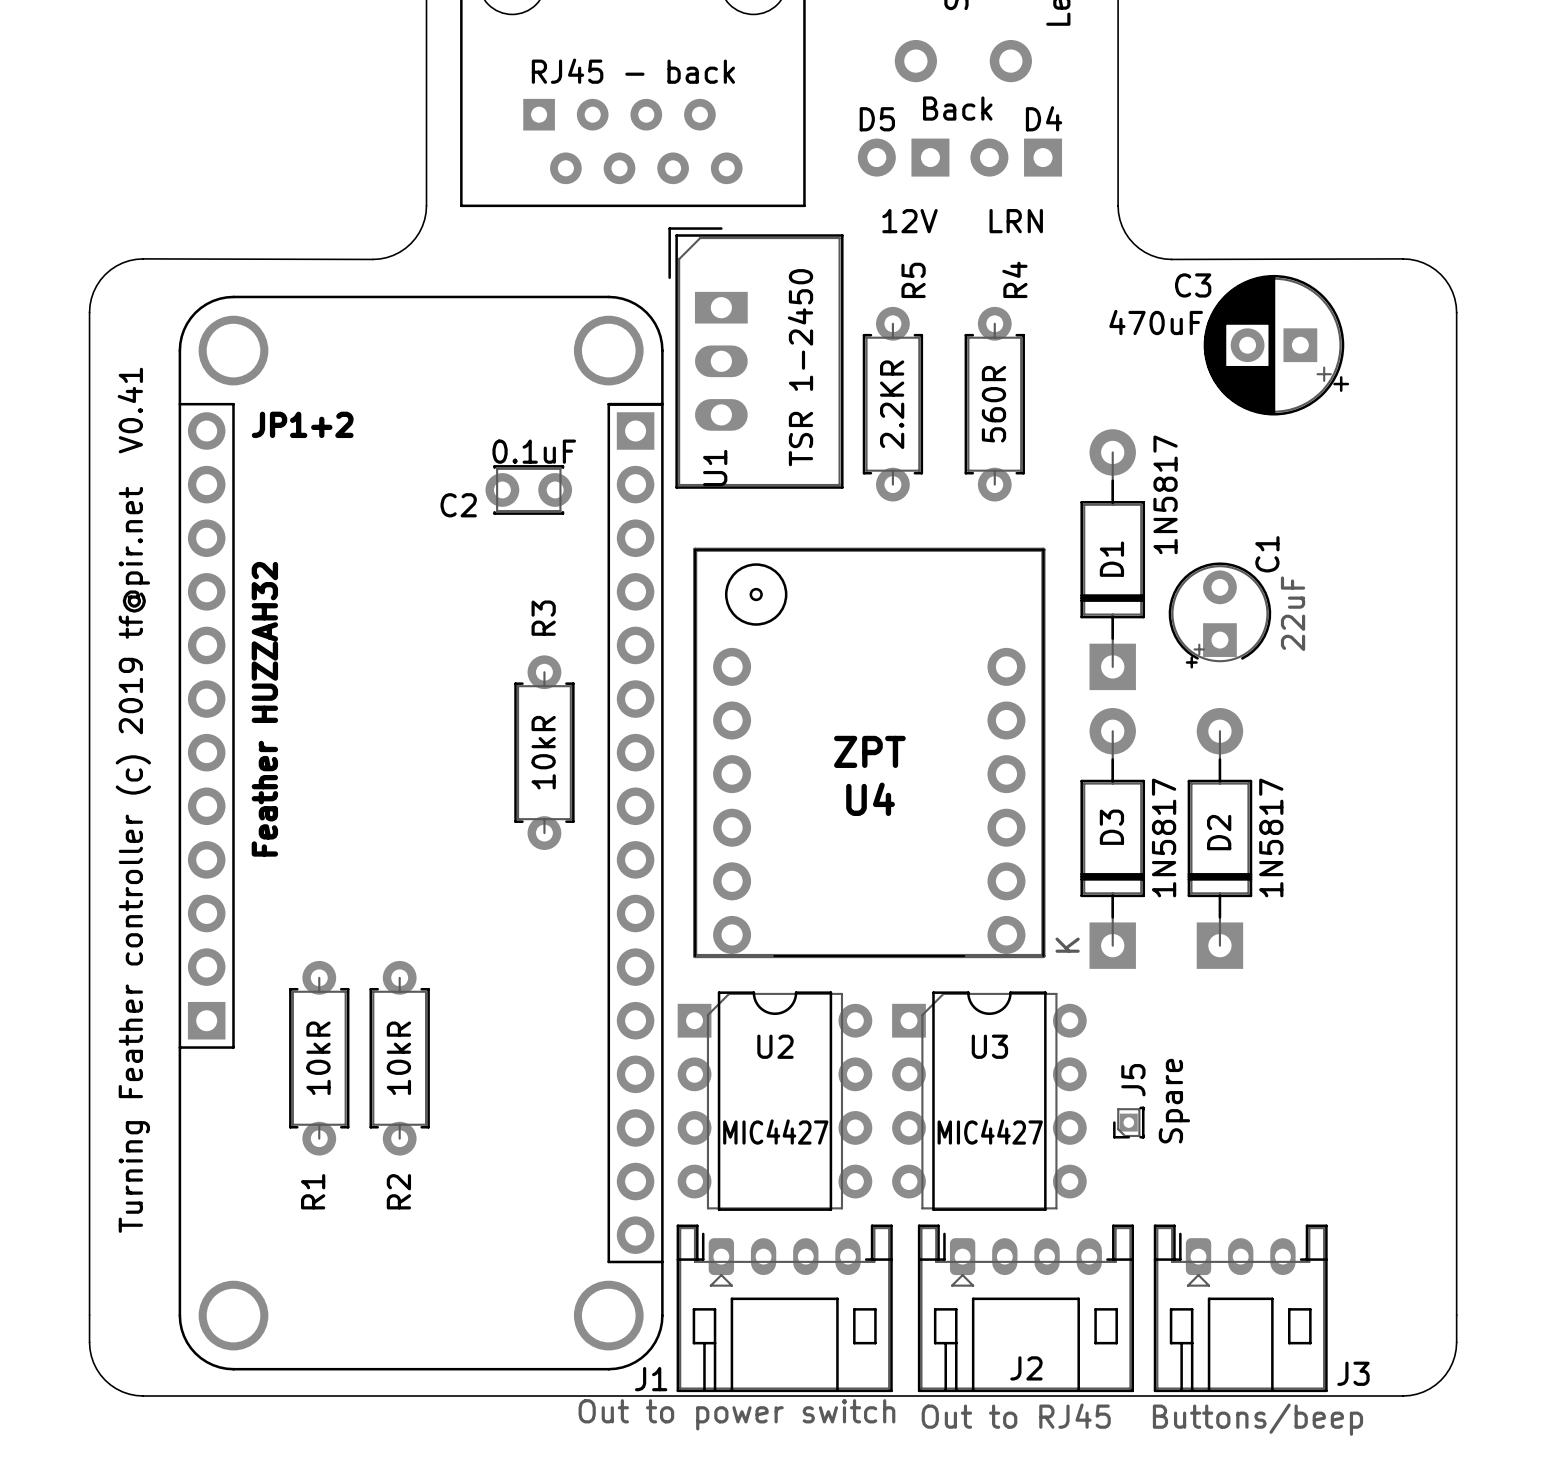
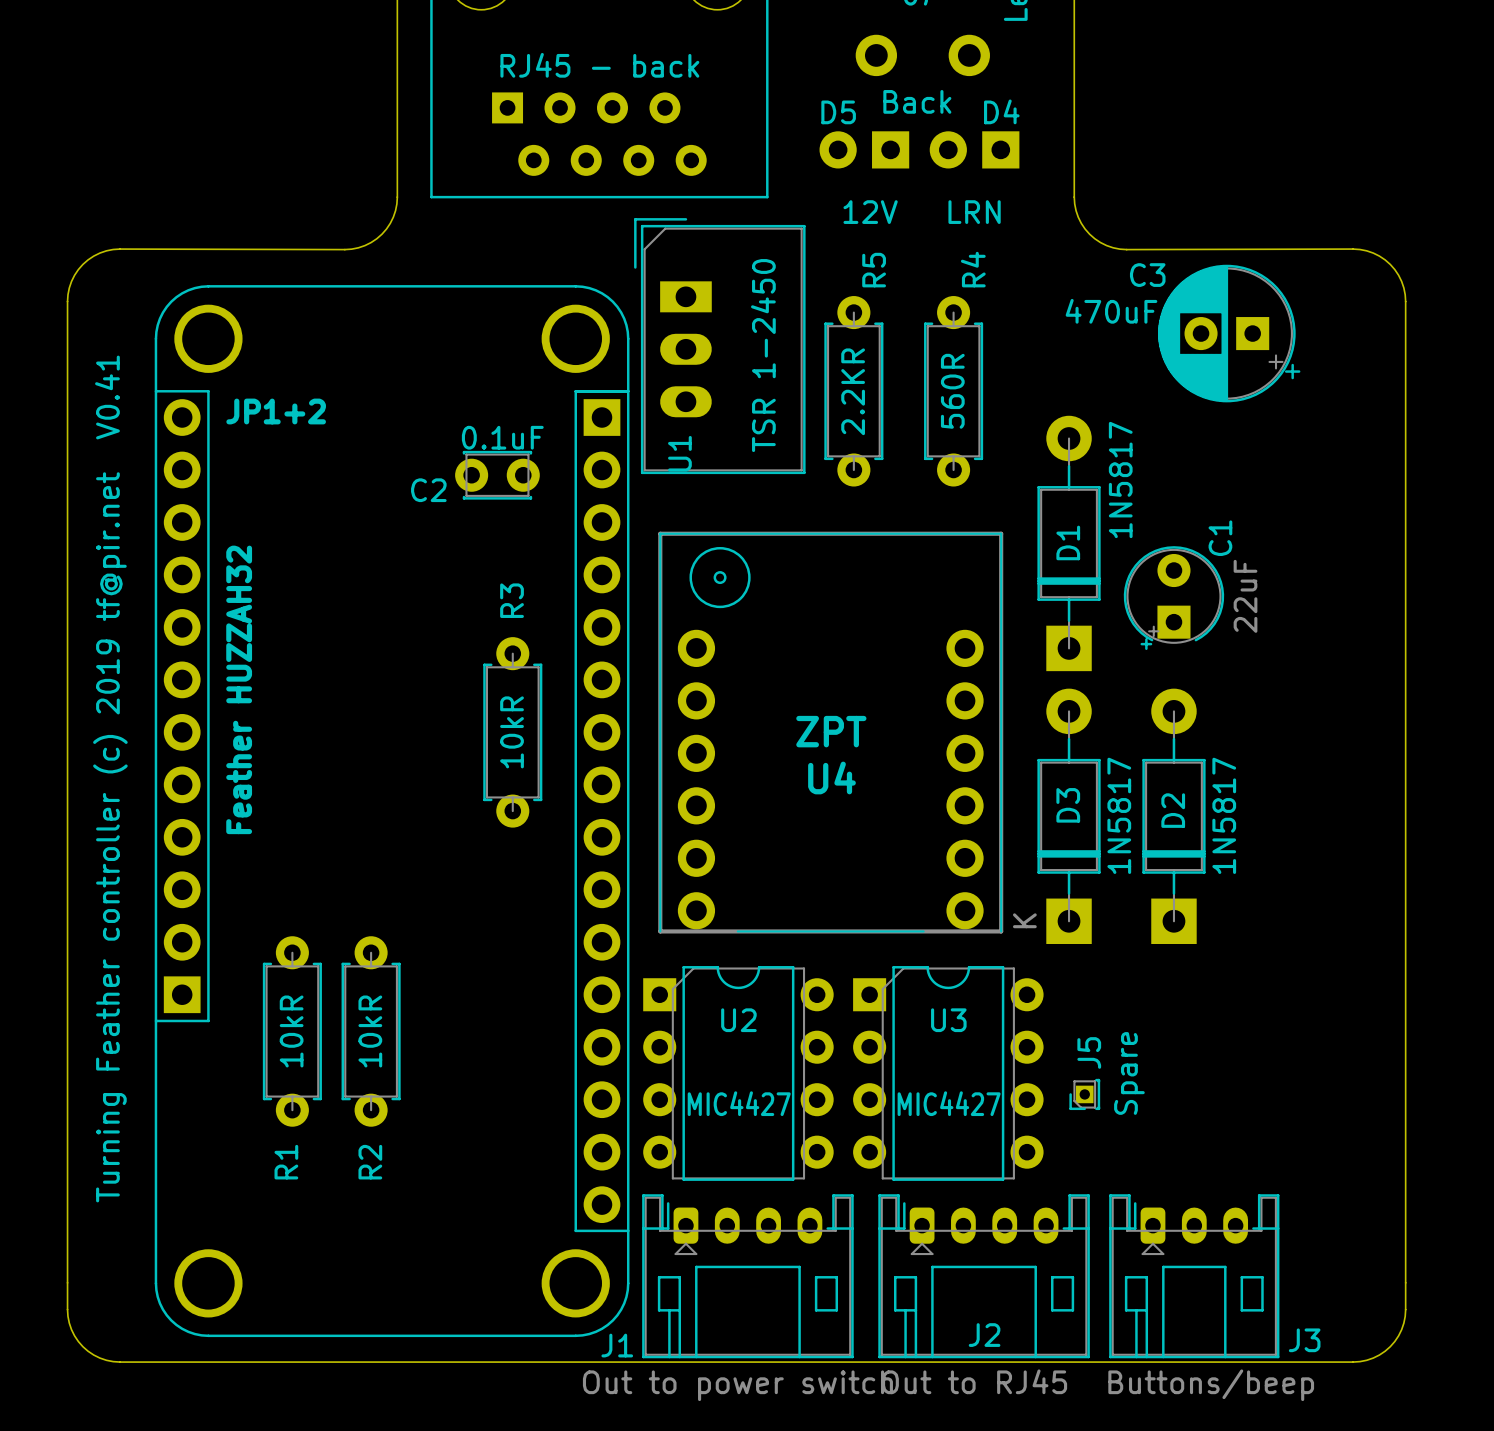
J1 value position: Out to power switch (736, 1414) -> Out to power switch (737, 1385)

